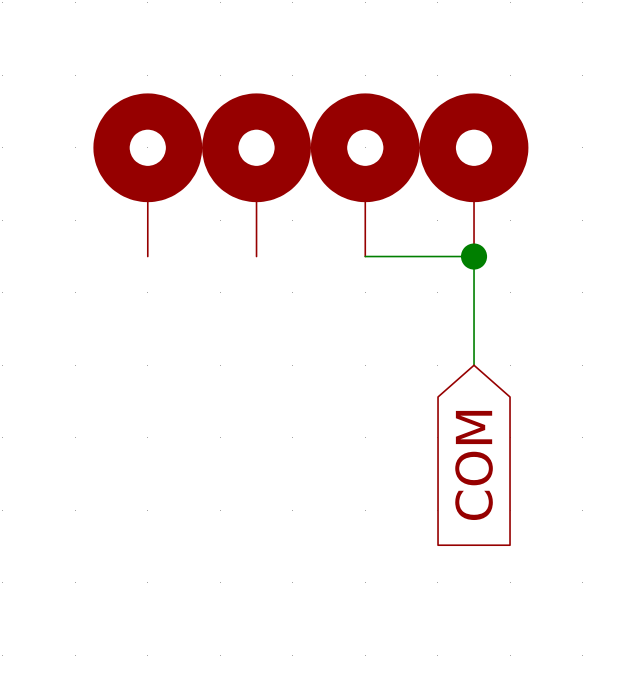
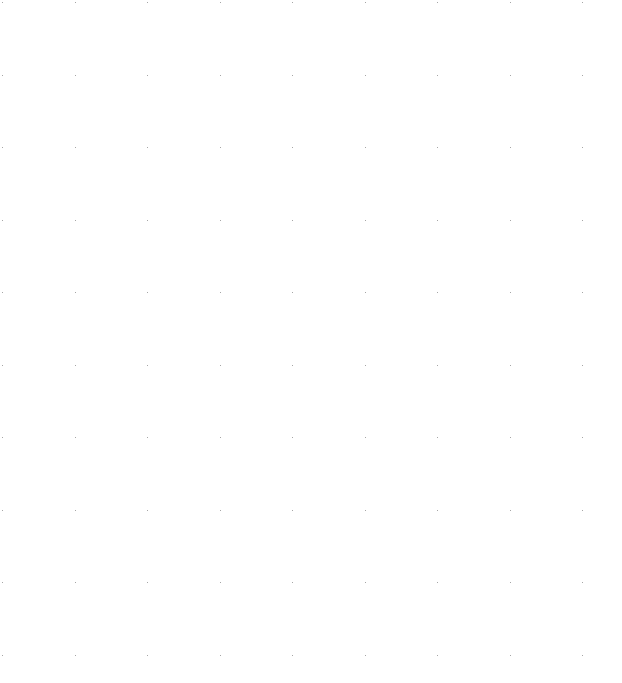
part: (147, 174) -> none
part: (256, 174) -> none
part: (365, 174) -> none
part: (474, 174) -> none
wire: (365, 256) (474, 256) (474, 365) -> none
junction: (474, 256) -> none
global label: COM (474, 465) -> none

